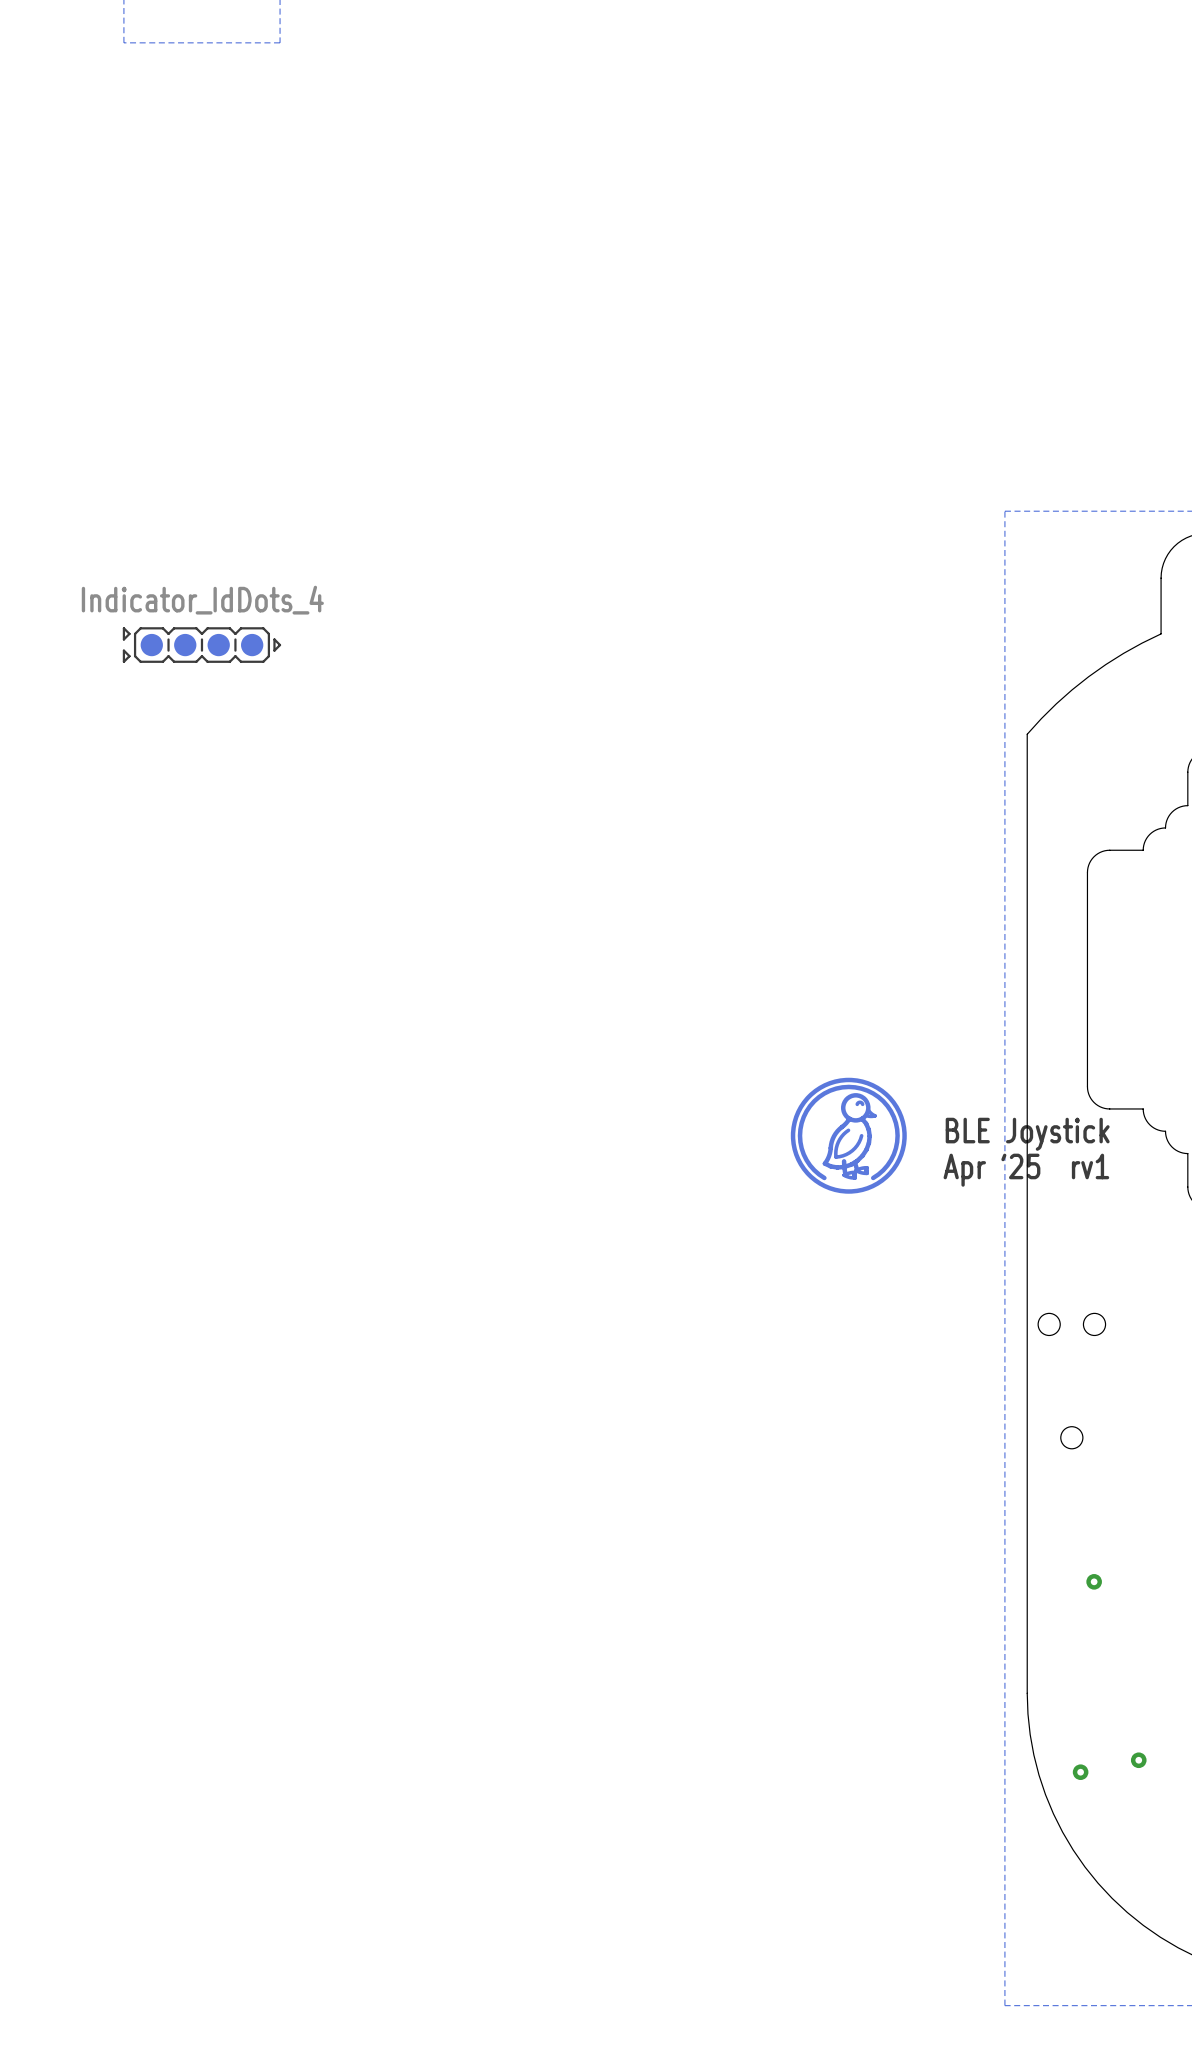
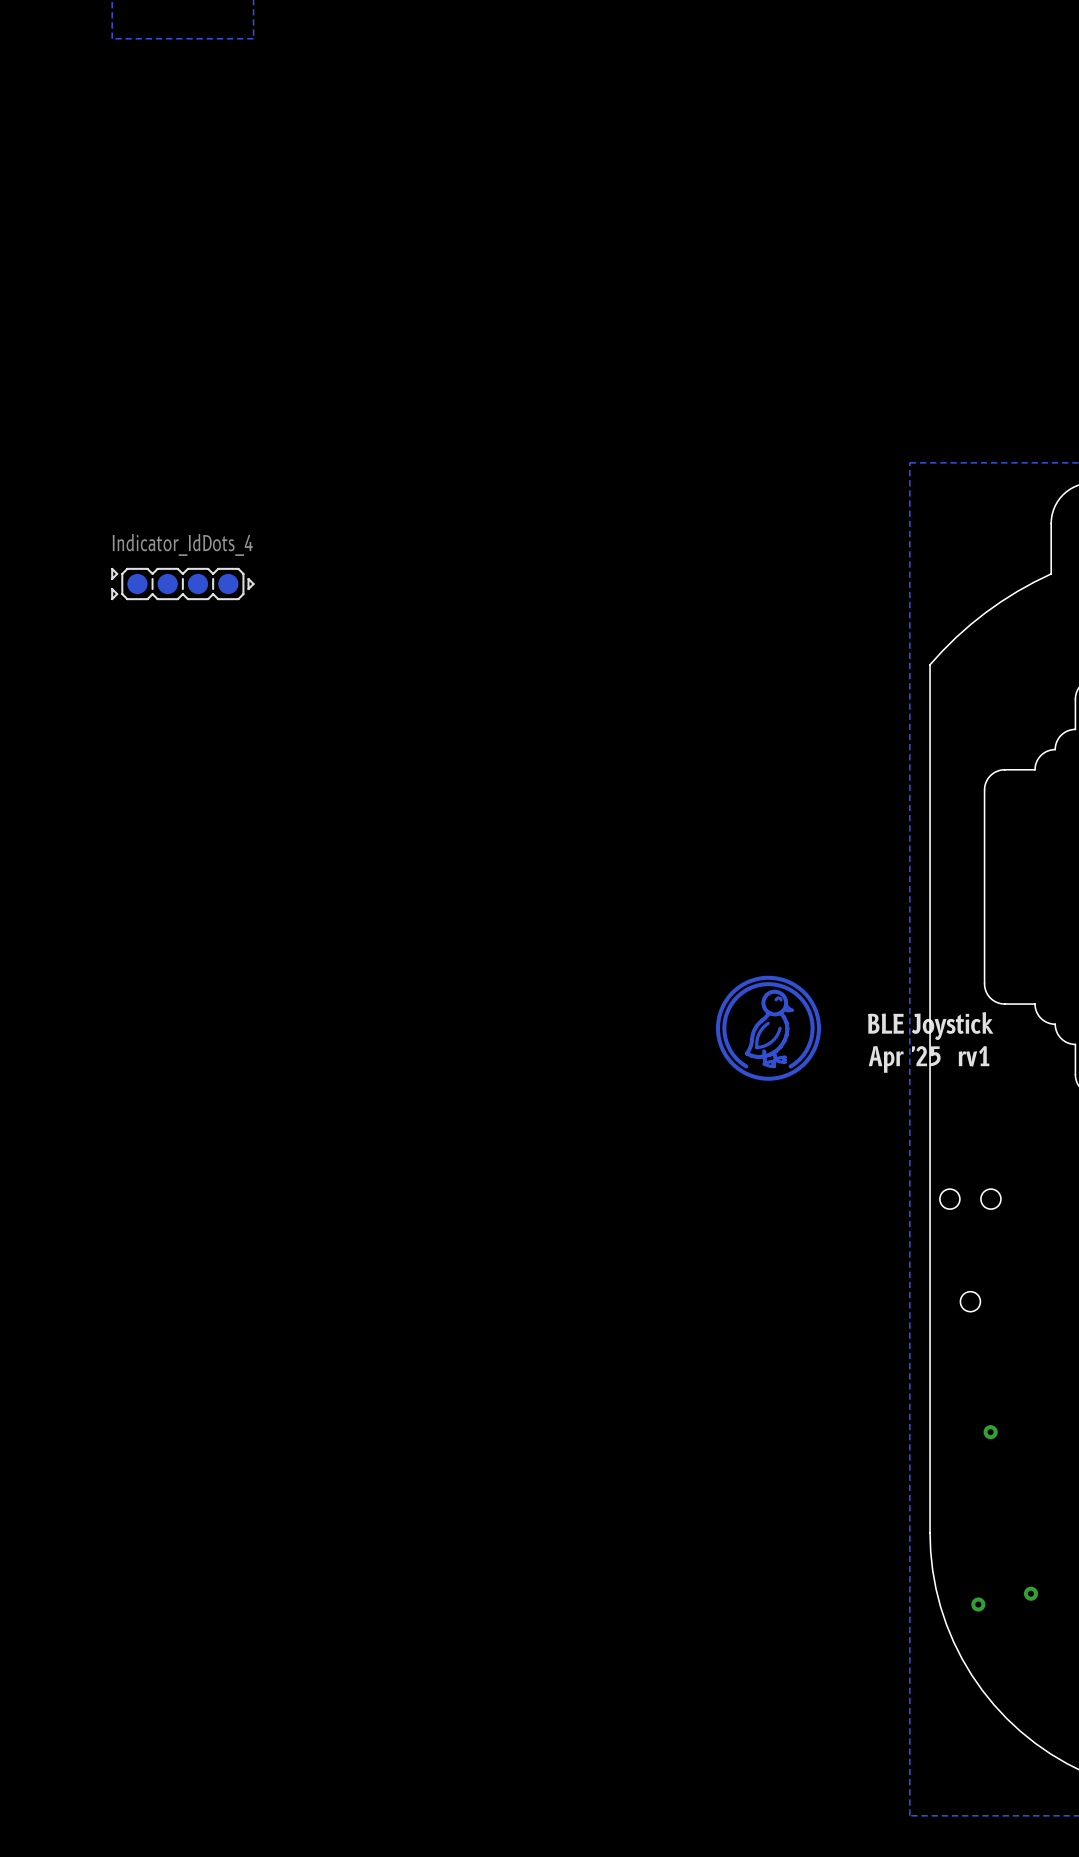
drawing shape: [81, 585, 324, 663] -> [111, 533, 255, 601]

